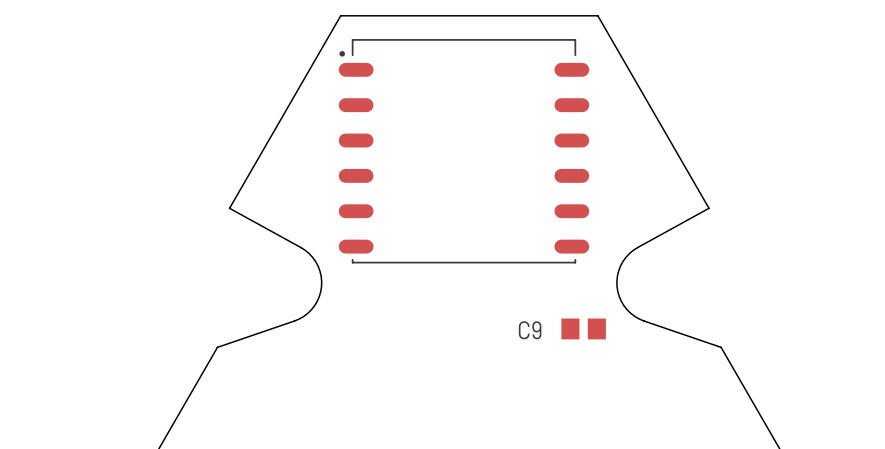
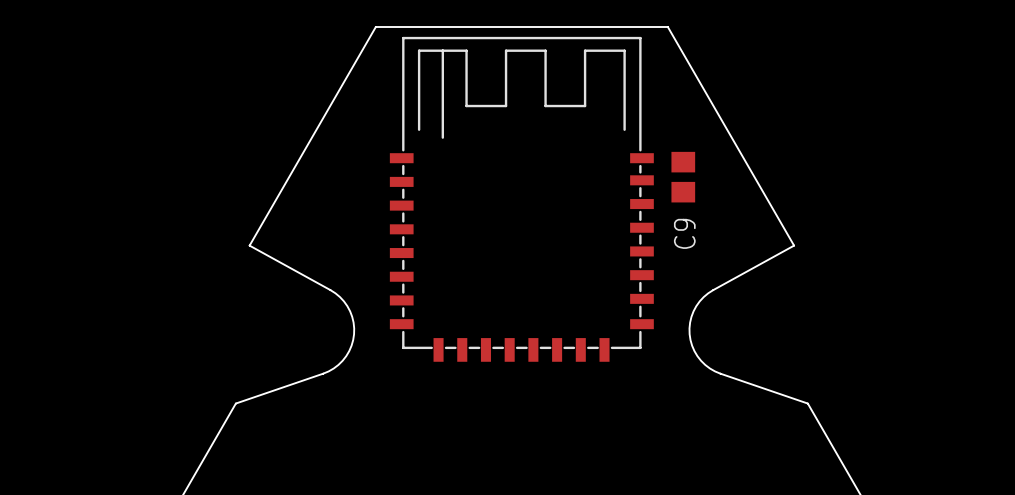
part: (463, 151) -> none
part: none -> (521, 199)
C9 rotation: 0° (583, 328) -> 90° clockwise (683, 177)
C9 position: (583, 328) -> (683, 177)
C9 name position: C9 (530, 330) -> C9 (684, 233)

